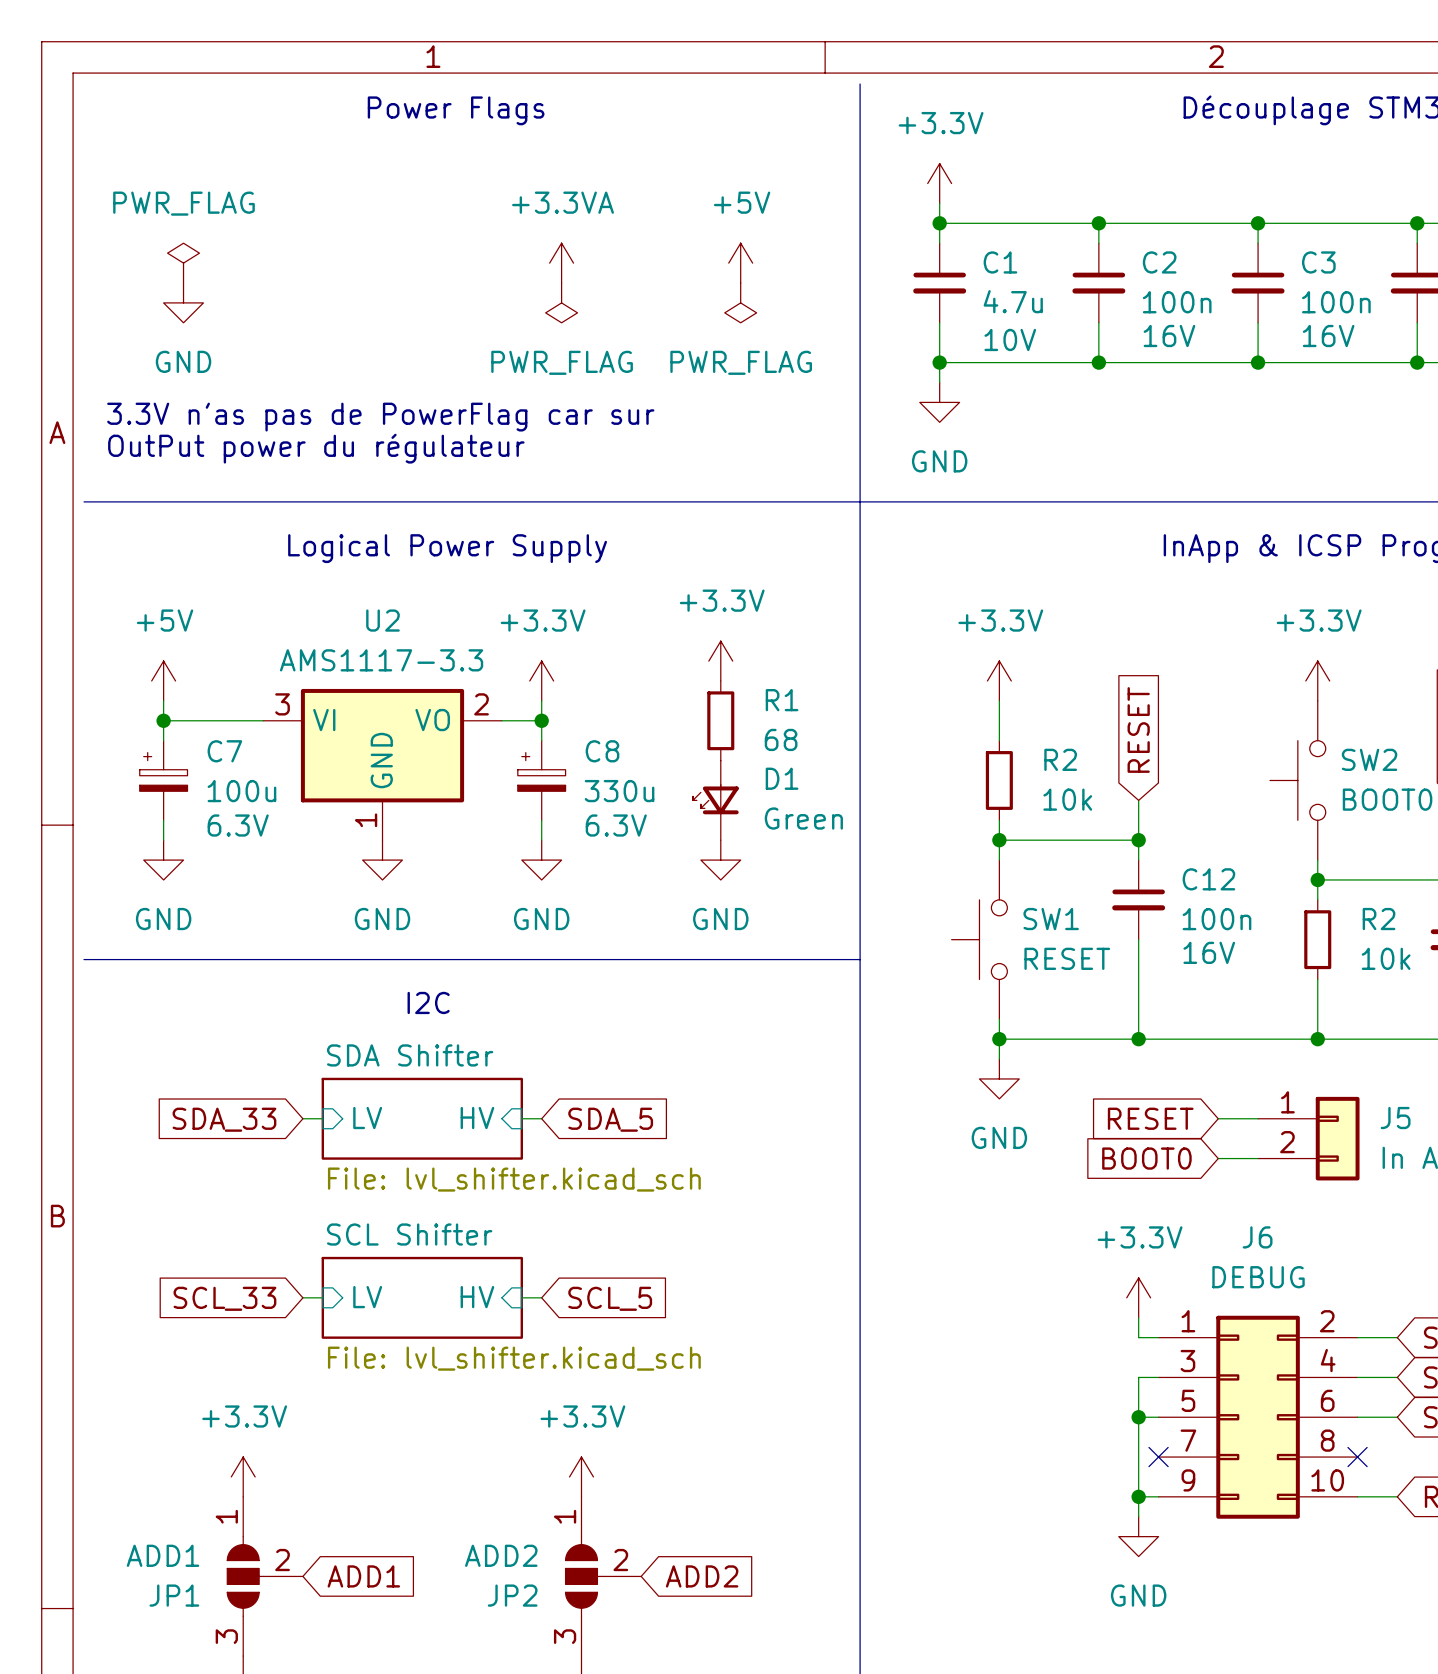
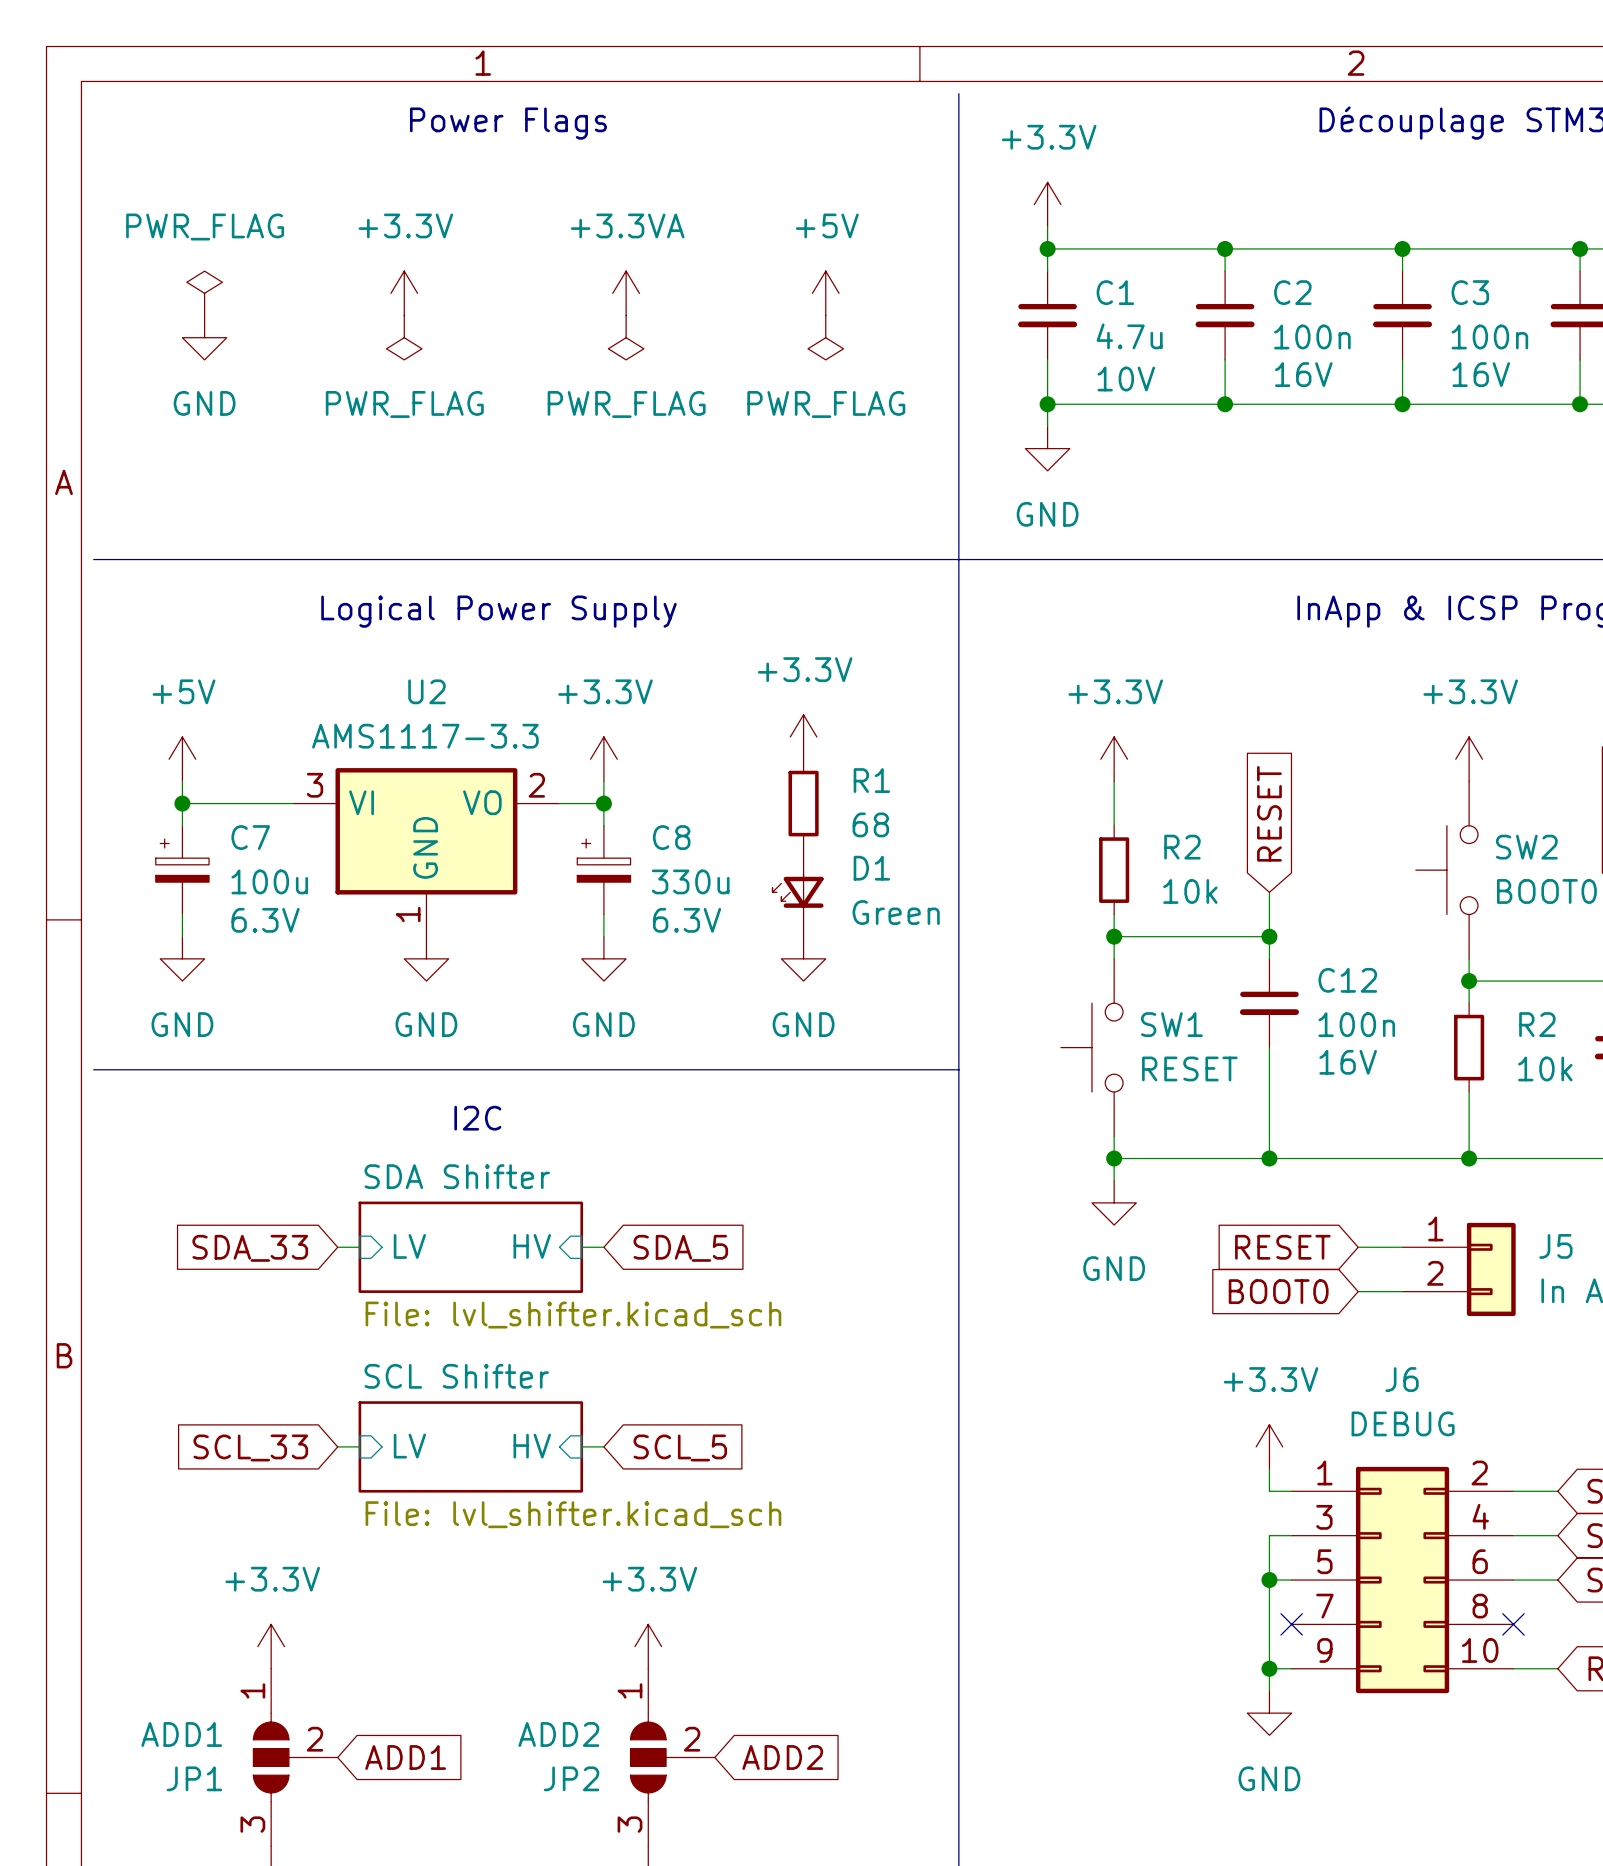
power symbol: none -> +3.3V (404, 293)
power symbol: none -> PWR_FLAG (404, 337)
text: 3.3V n'as pas de PowerFlag car sur (380, 417) -> none
text: OutPut power du régulateur (316, 448) -> none

